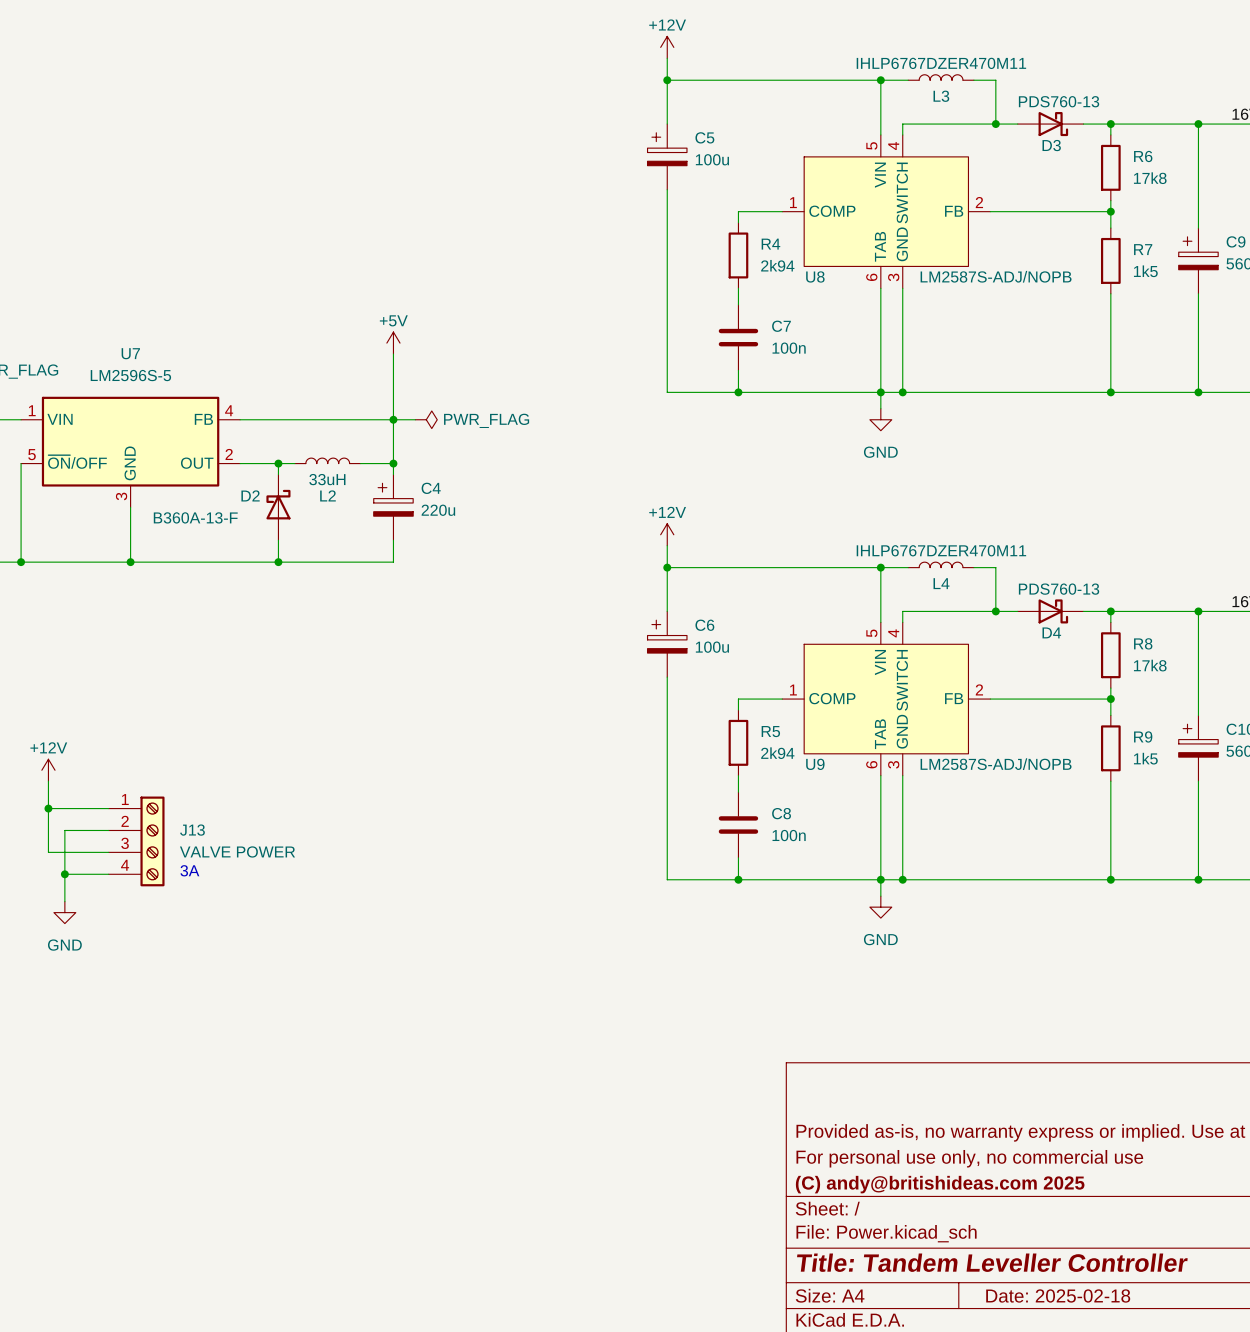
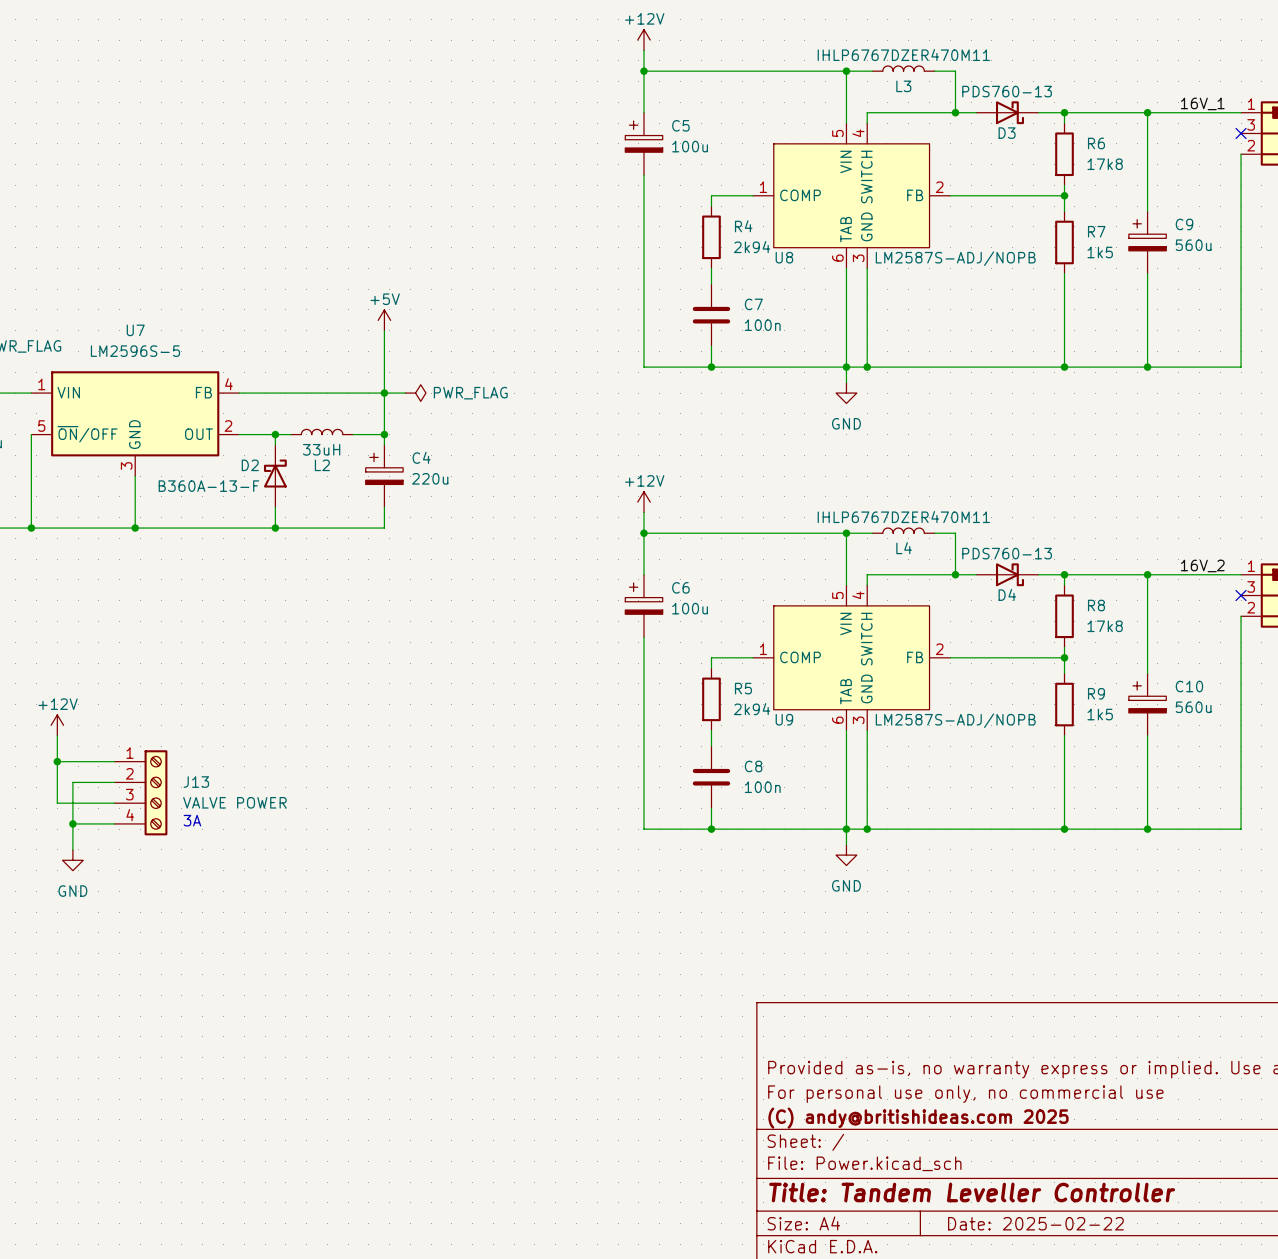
title block: Date: 2025-02-18 (1058, 1295) -> Date: 2025-02-22 (1035, 1223)

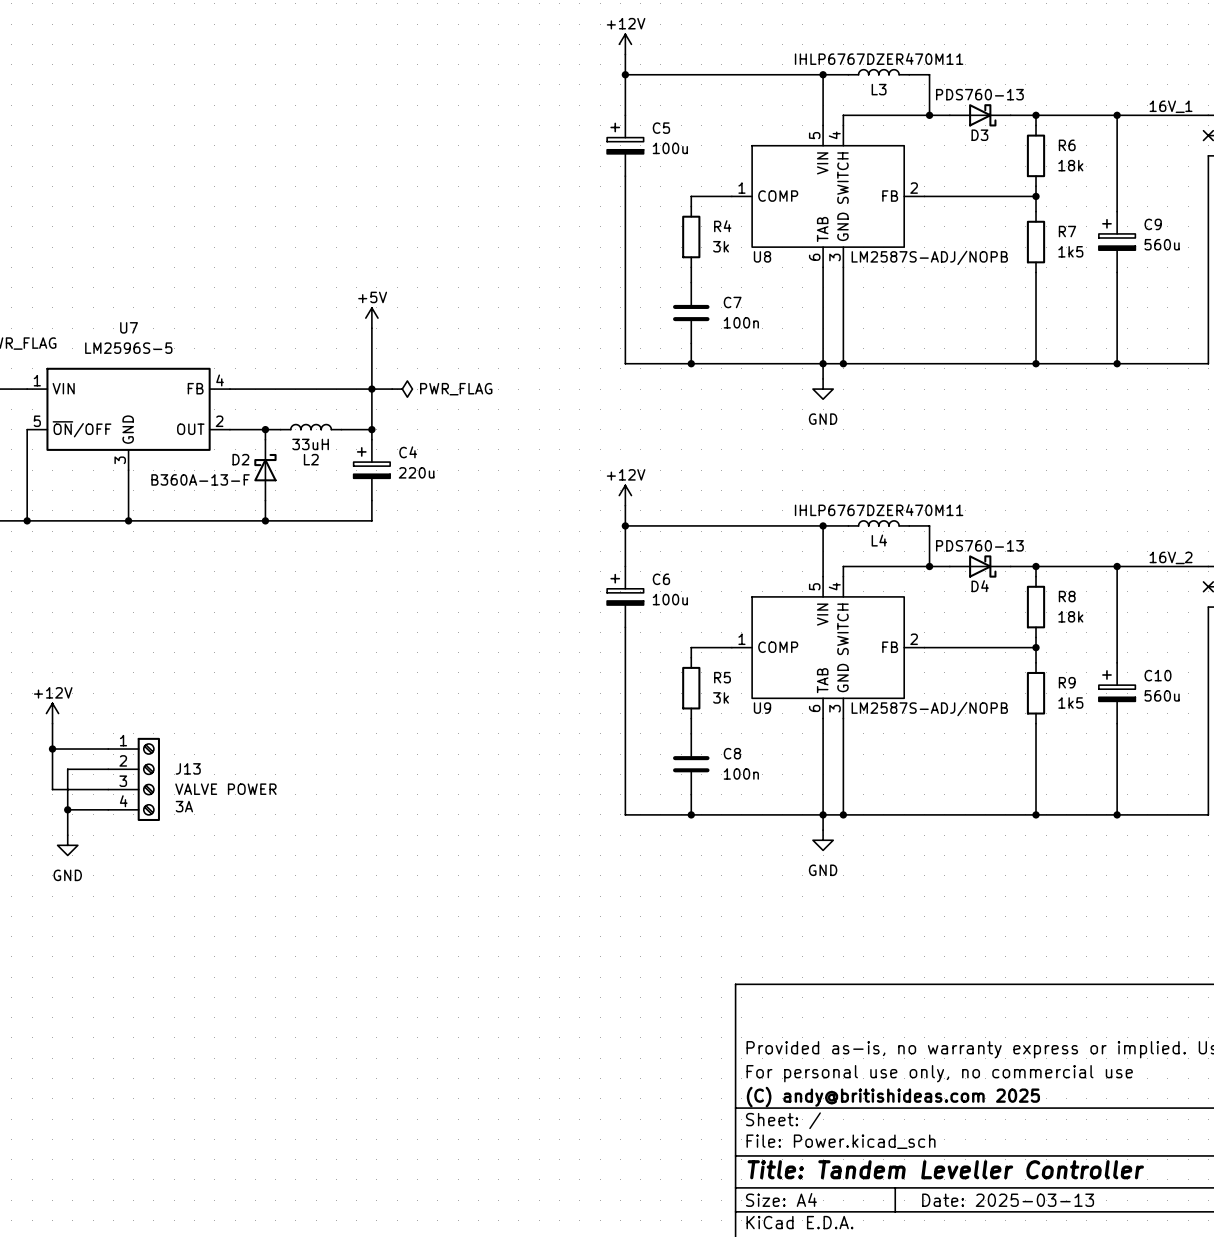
R6 value: 17k8 (1105, 164) -> 18k (1070, 165)
R4 value: 2k94 (752, 247) -> 3k (721, 246)
R8 value: 17k8 (1105, 626) -> 18k (1070, 616)
R5 value: 2k94 (752, 709) -> 3k (721, 697)
title block: Date: 2025-02-22 (1035, 1223) -> Date: 2025-03-13 (1008, 1200)

